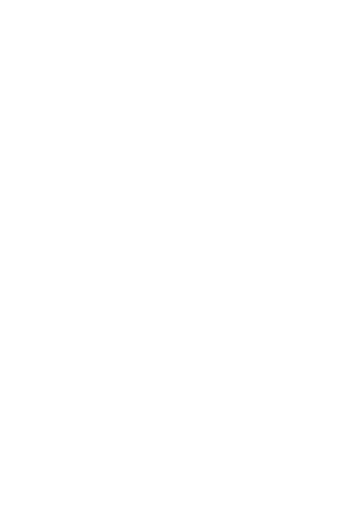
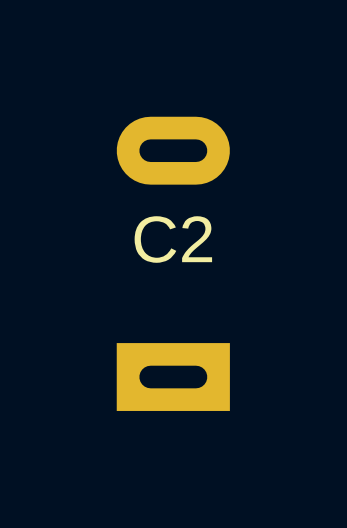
C2: none -> (173, 263)

